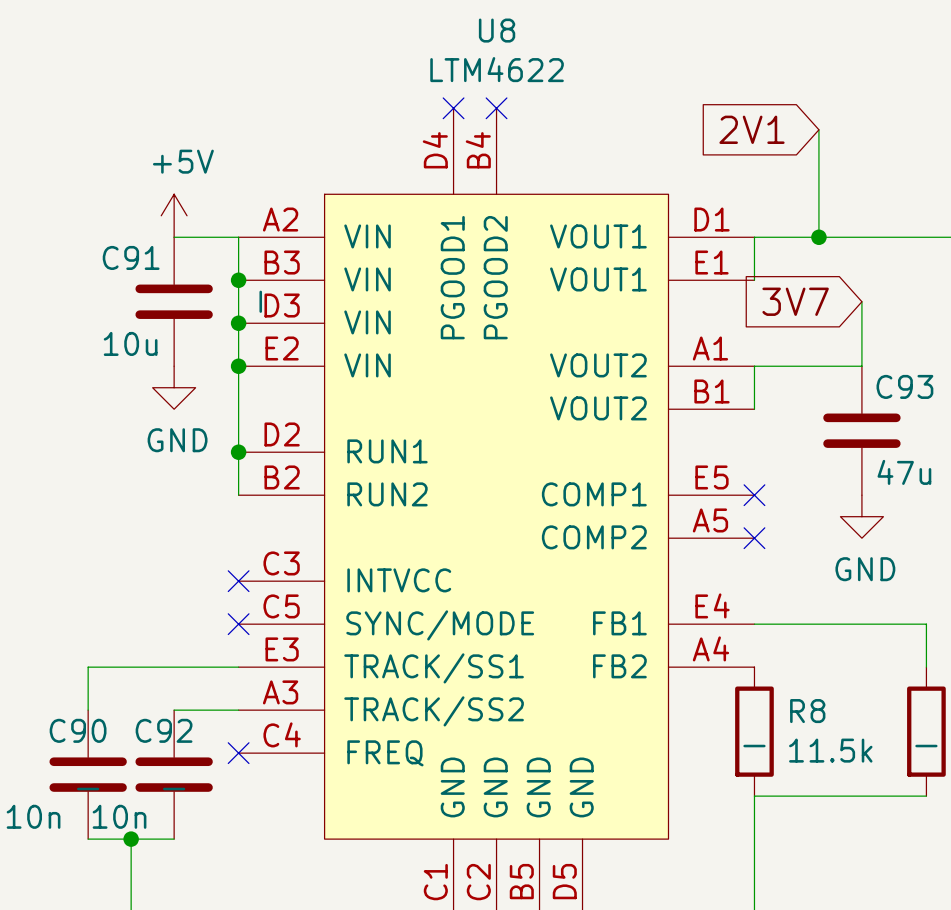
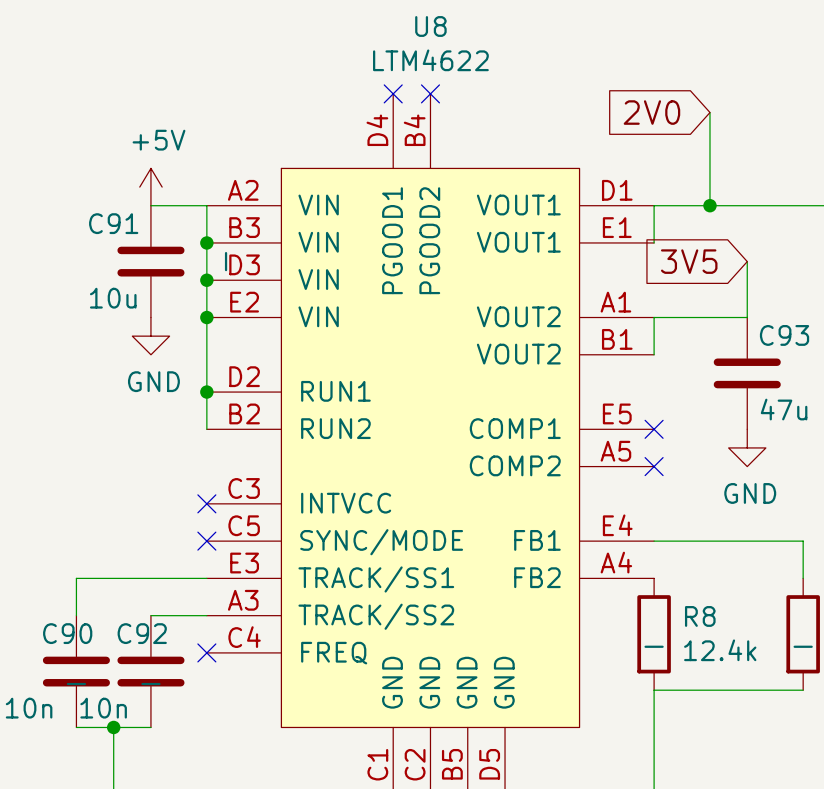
global label: 2V1 (752, 129) -> 2V0 (651, 112)
global label: 3V7 (795, 301) -> 3V5 (689, 261)
R8 value: 11.5k (830, 750) -> 12.4k (720, 650)

